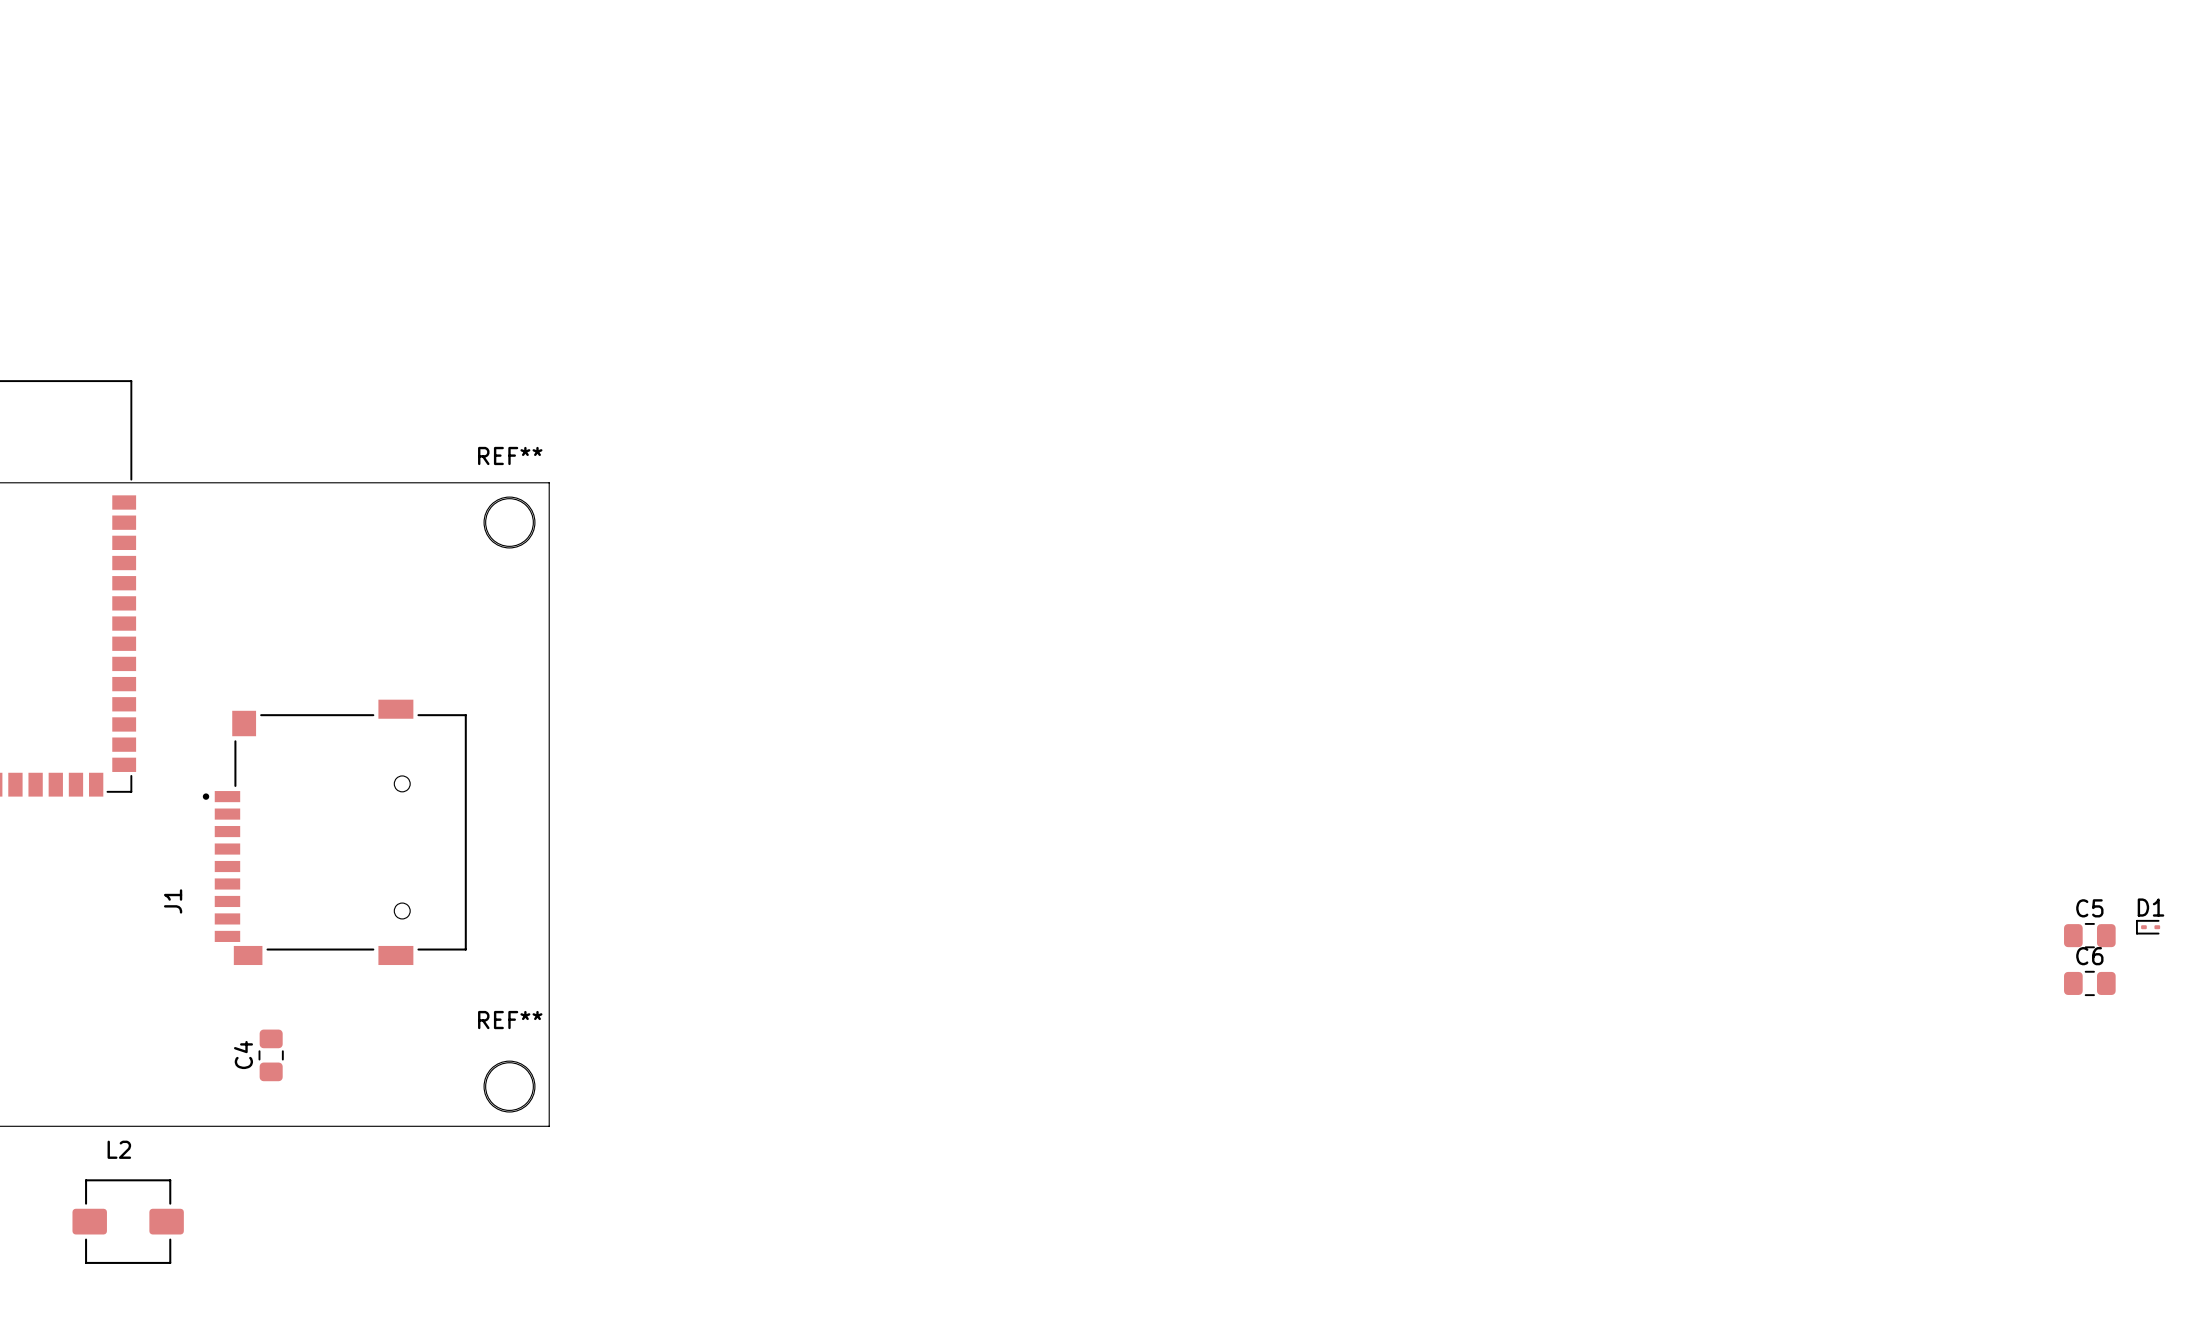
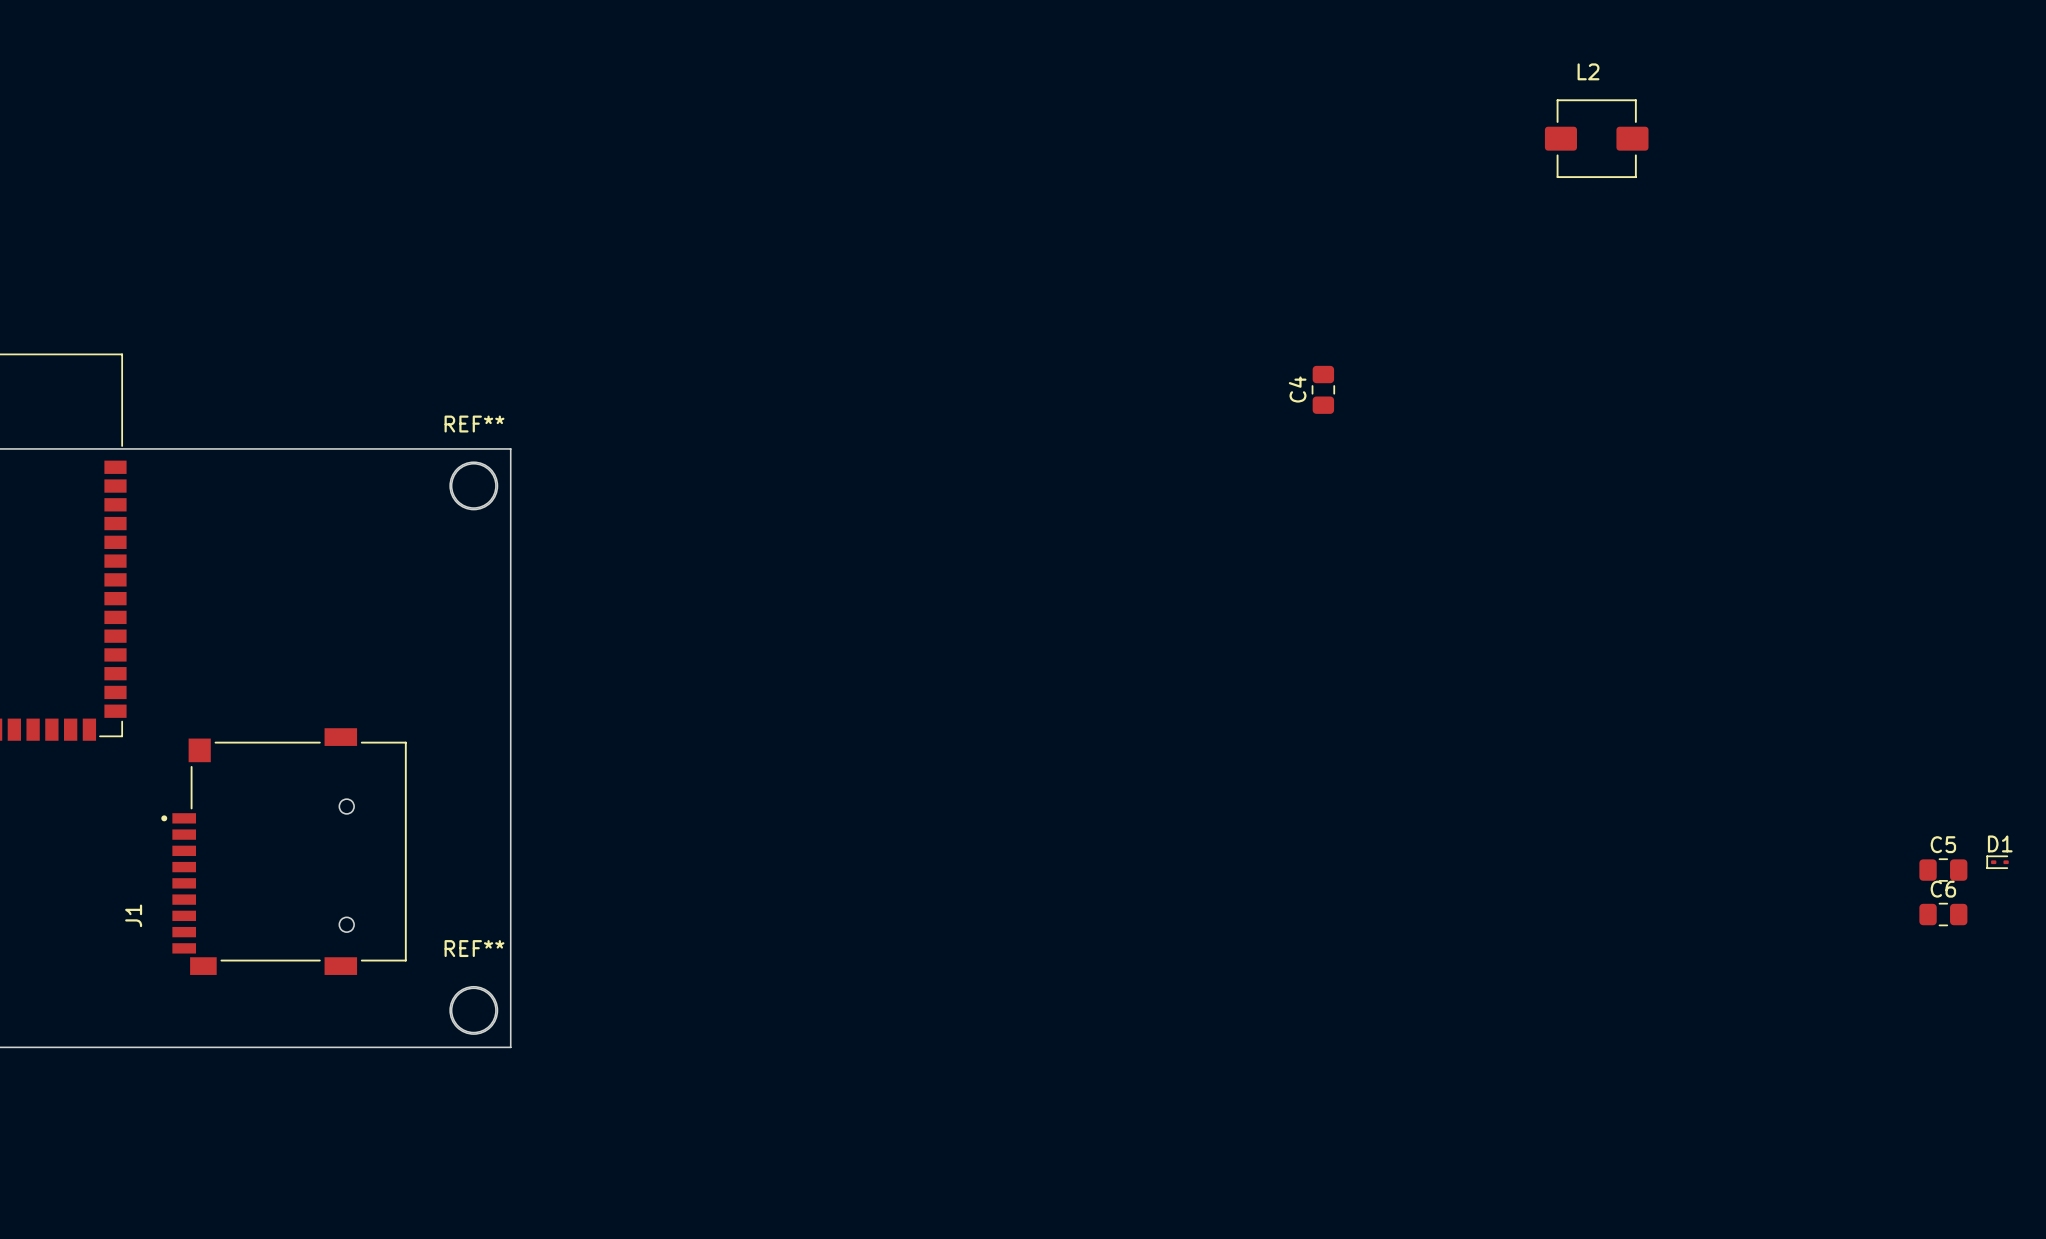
J1 position: (334, 832) -> (284, 851)
C4 position: (271, 1055) -> (1323, 389)
L2 position: (128, 1221) -> (1596, 138)

